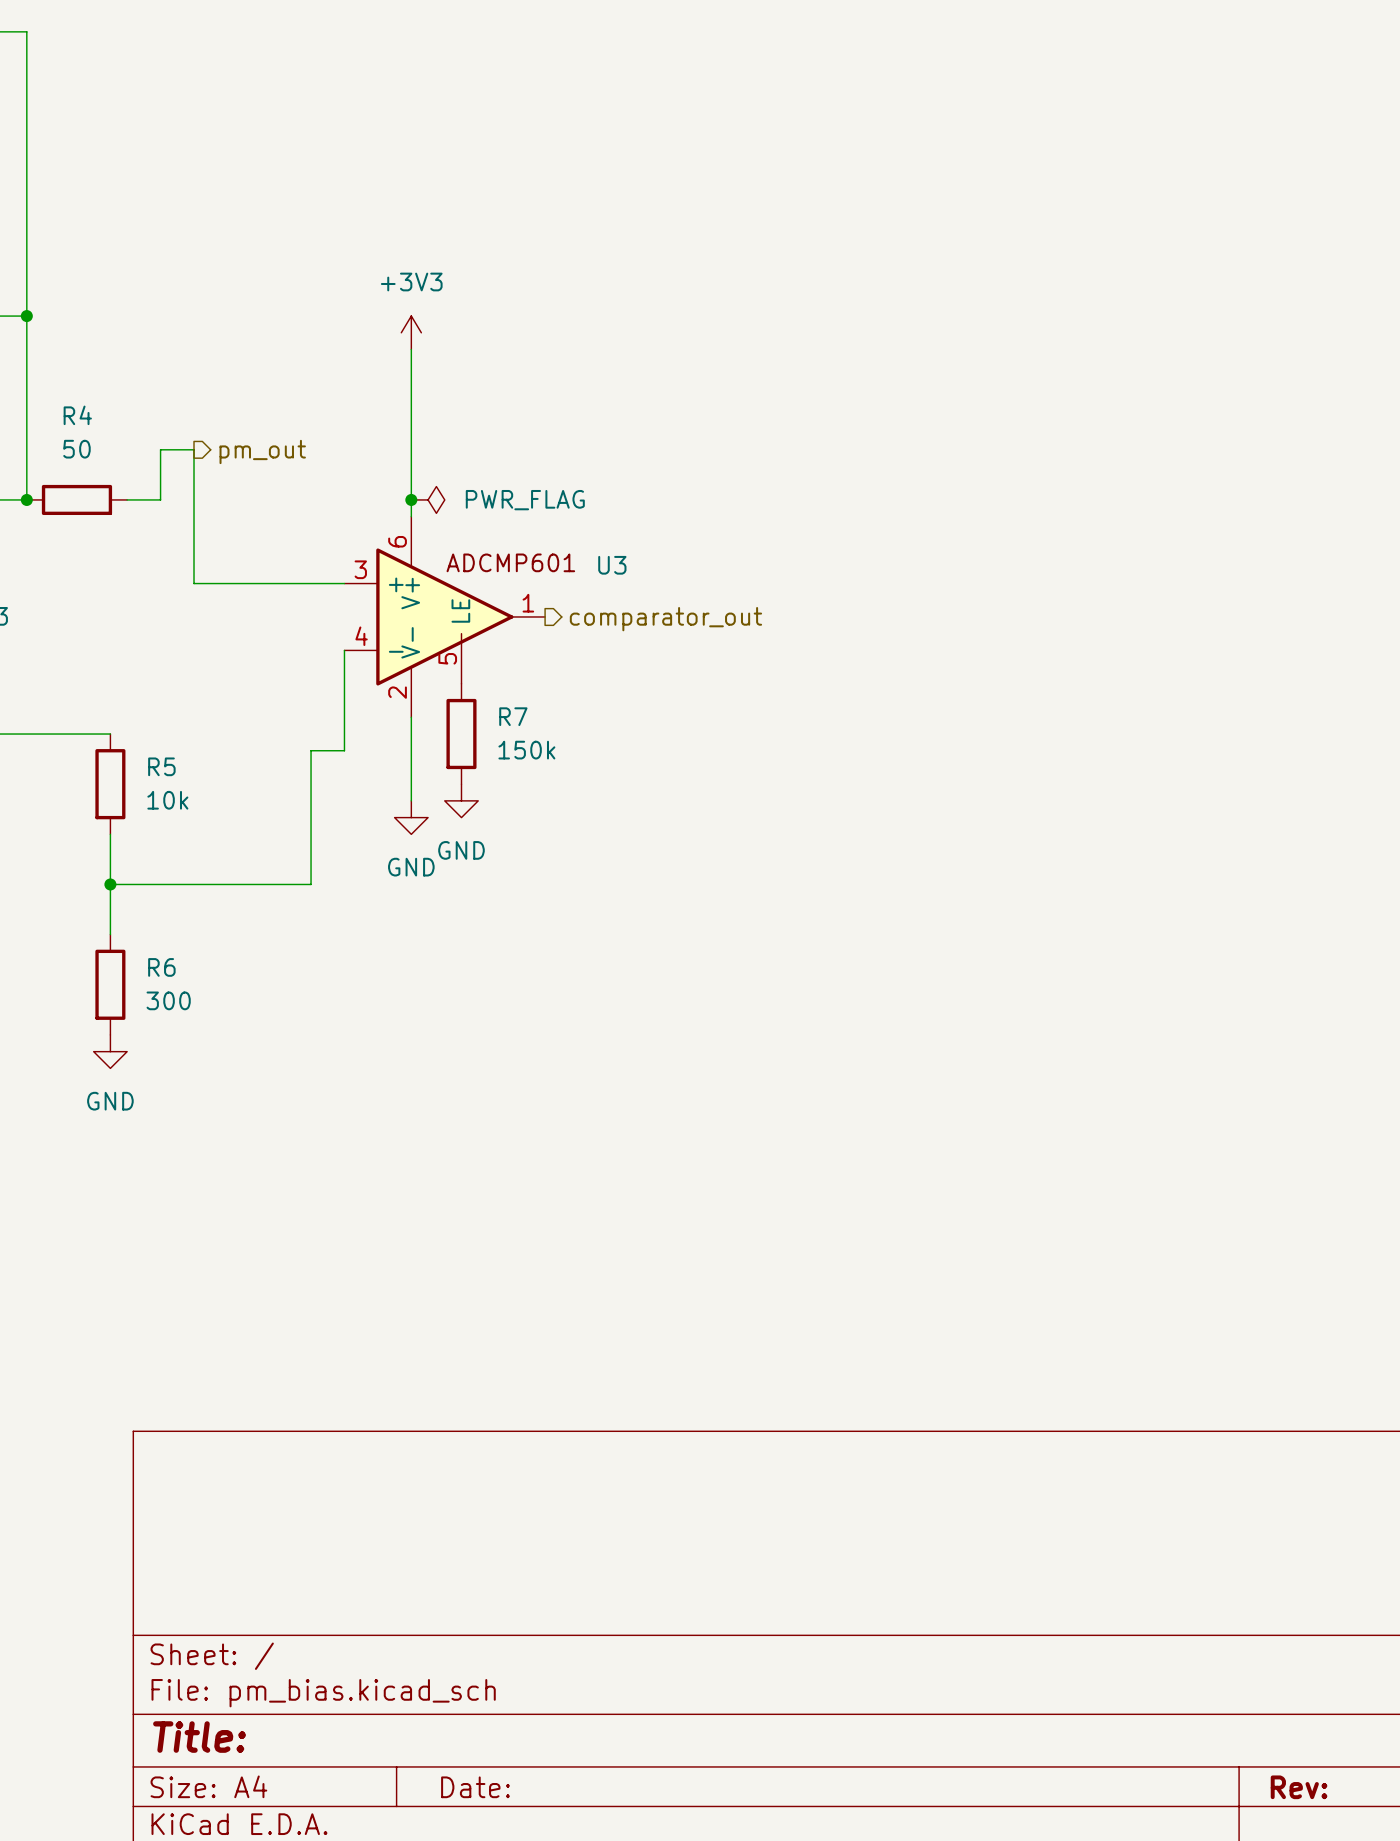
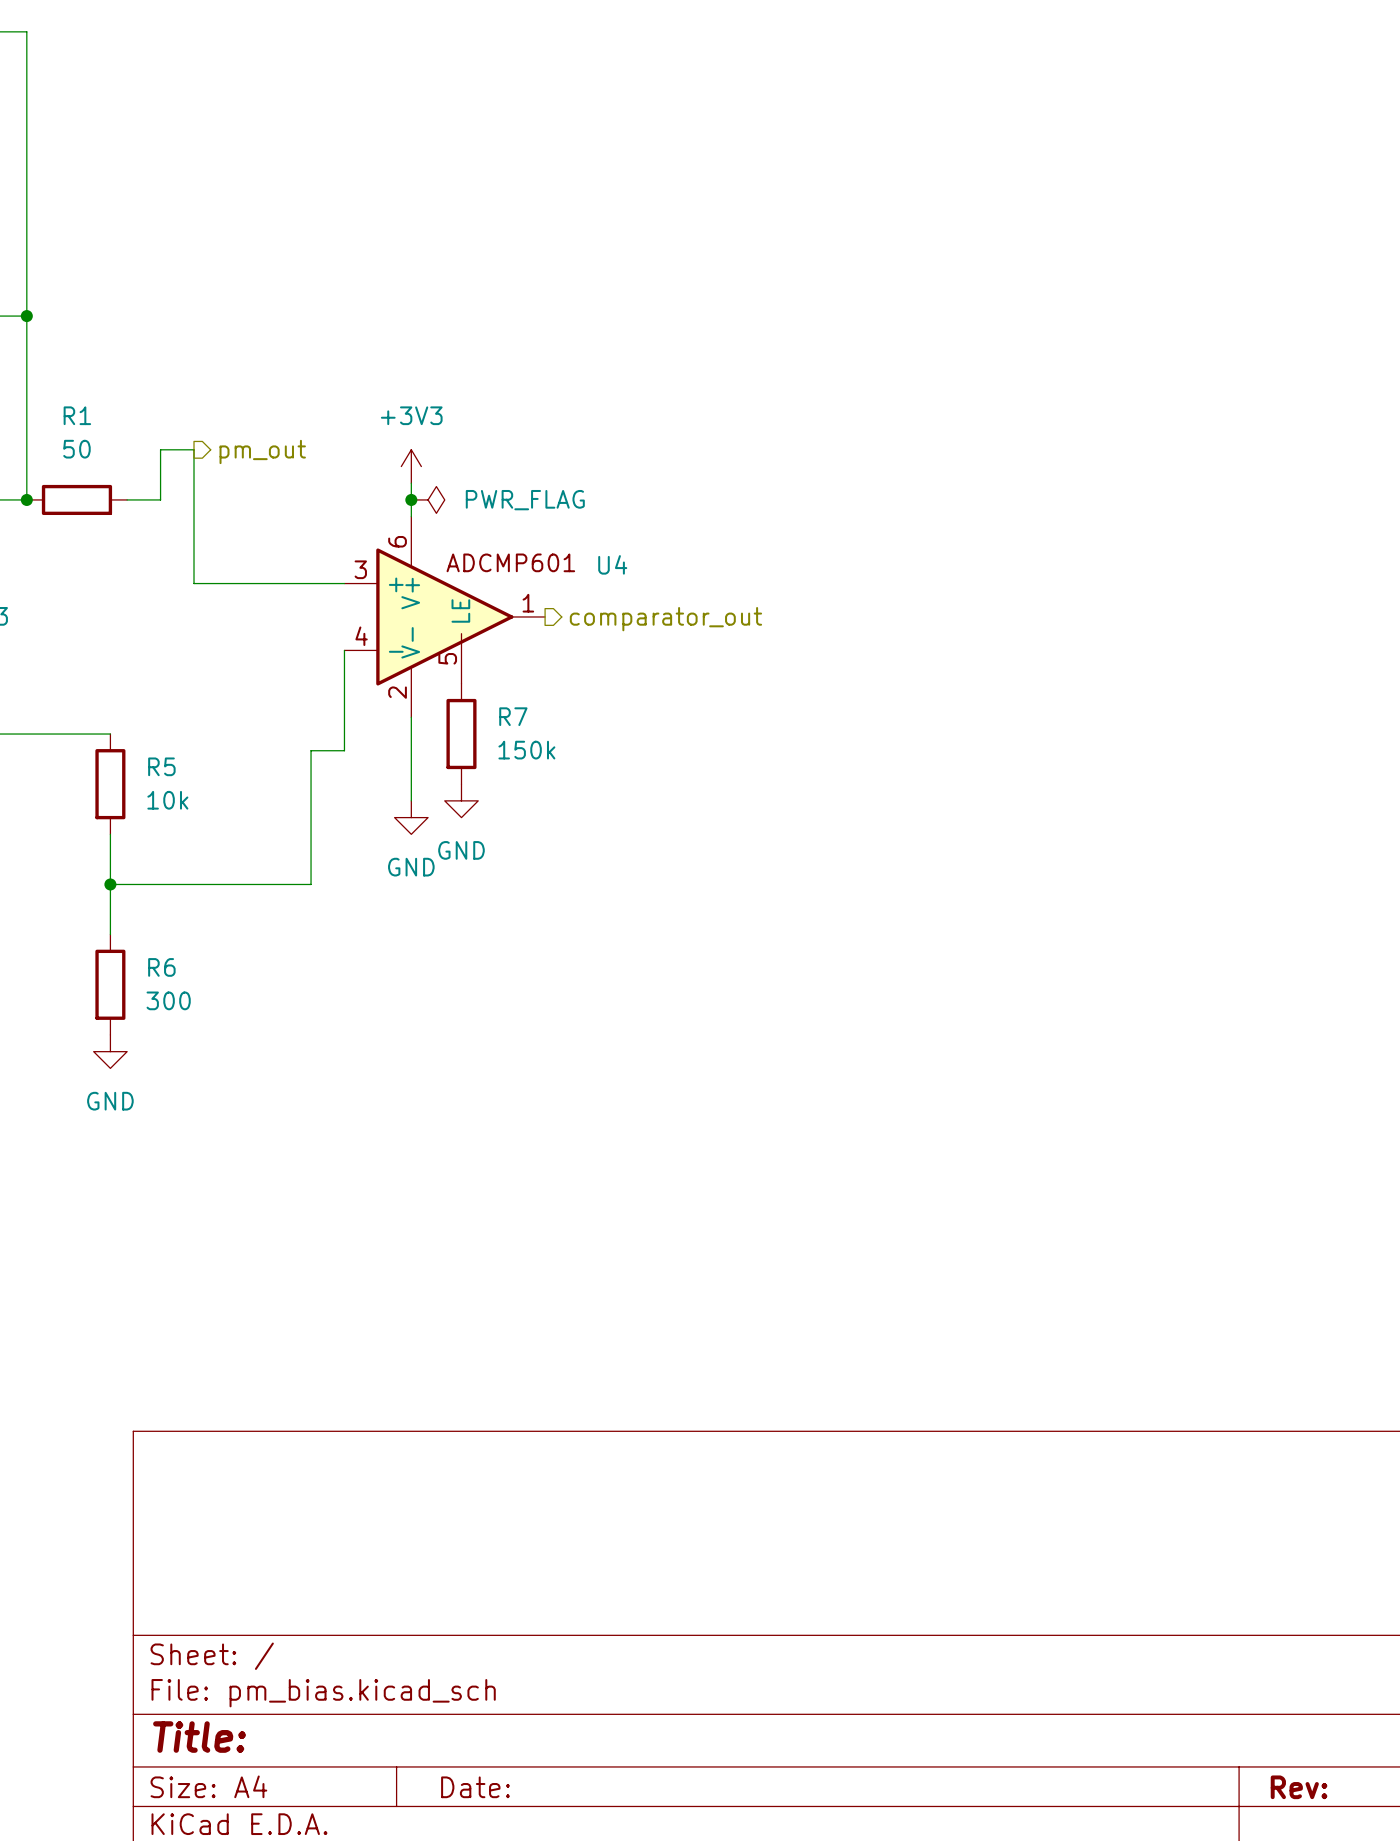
power symbol position: +3V3 (411, 332) -> +3V3 (411, 466)
wire: (411, 349) (411, 483) -> none
R4 name: R4 (77, 415) -> R1 (77, 415)
U3 name: U3 (612, 565) -> U4 (612, 564)

